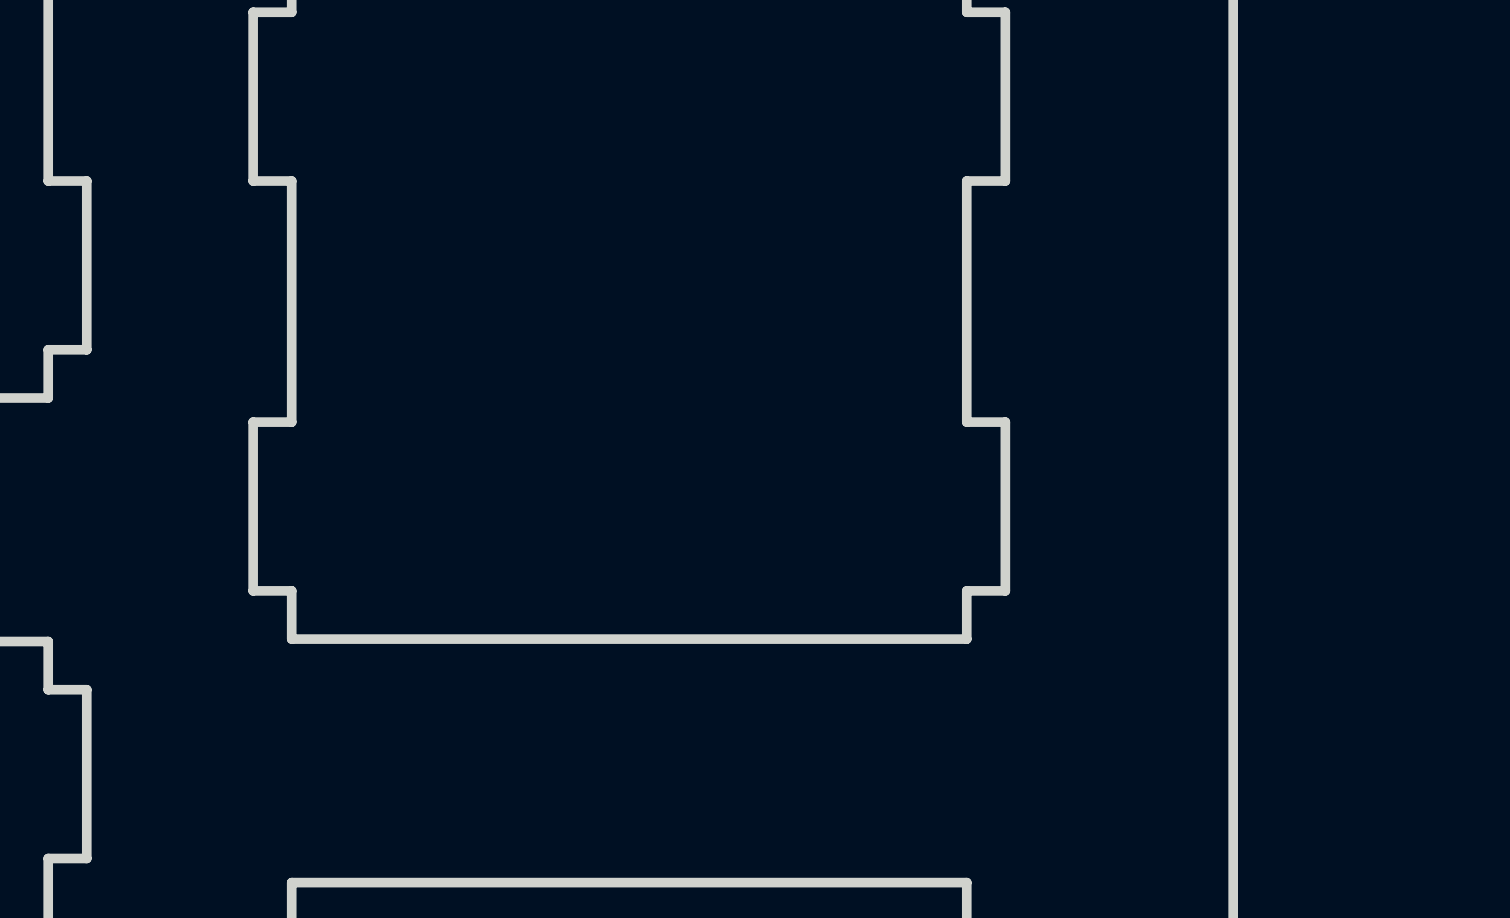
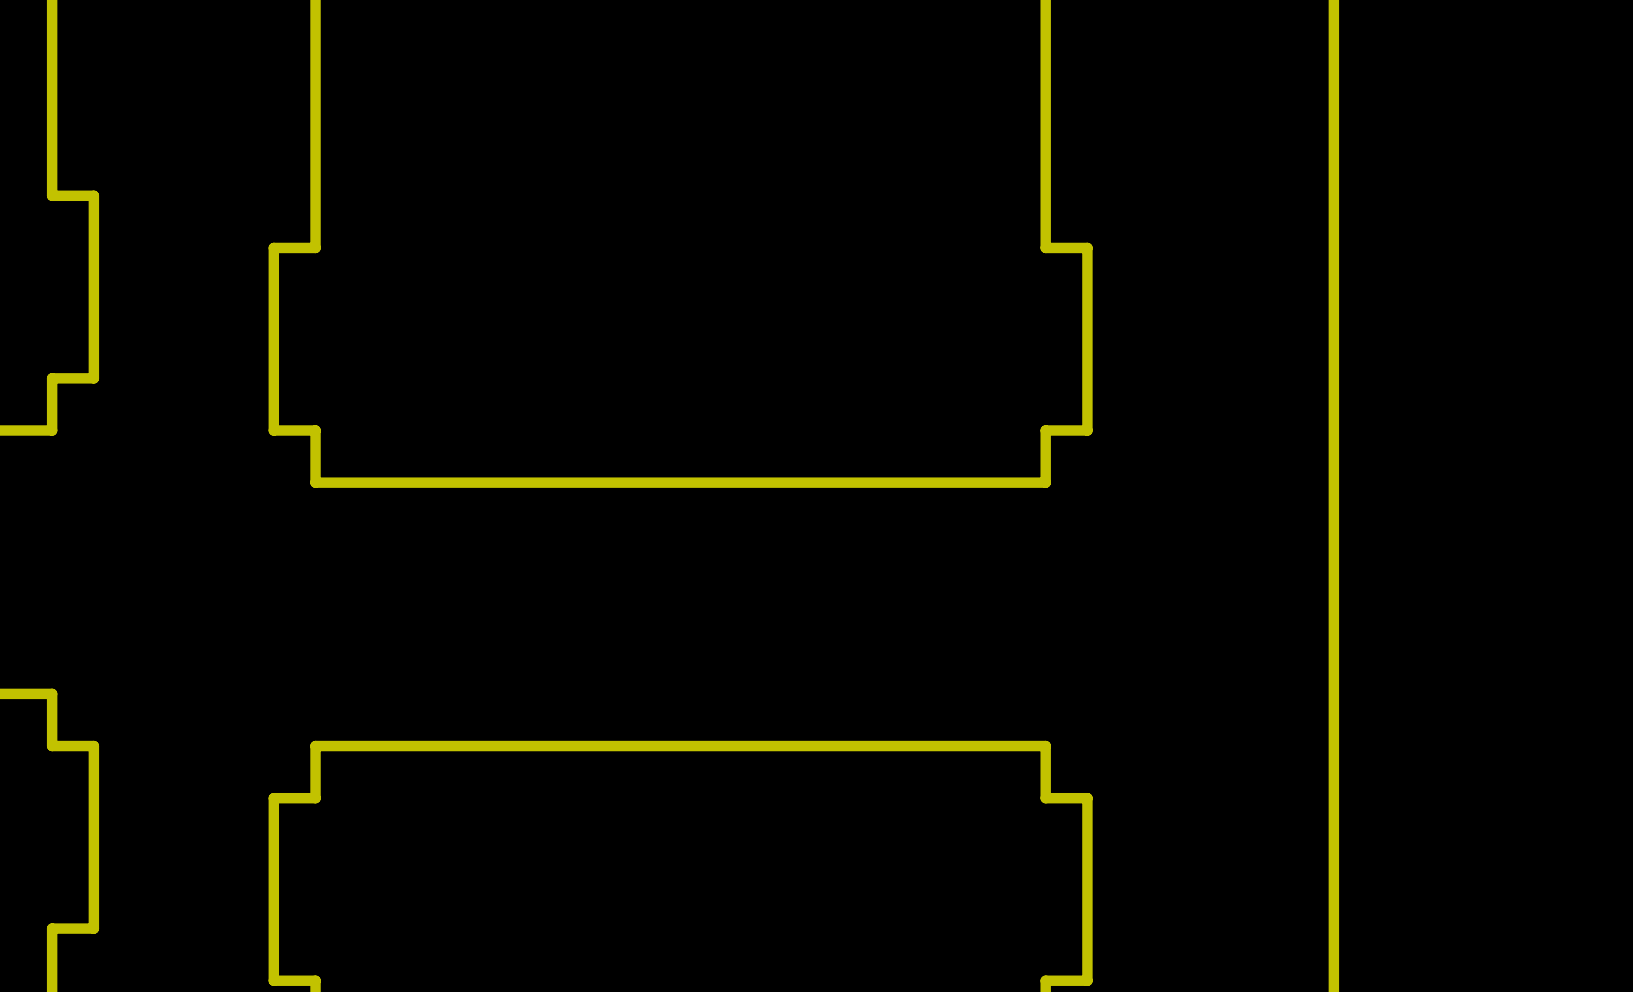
board edge: (291, 12) (253, 12) (253, 181) (291, 181) -> (315, 13) (315, 195)
board edge: (966, 12) (1005, 12) (1005, 181) (966, 181) -> (1045, 13) (1045, 195)
board edge: (291, 229) (291, 398) -> (315, 247) (273, 247) (273, 430) (315, 430)
board edge: (966, 229) (966, 398) -> (1045, 247) (1087, 247) (1087, 430) (1045, 430)
board edge: (966, 422) (1005, 422) (1005, 590) (966, 590) (966, 639) (291, 639) (291, 590) (253, 590) (253, 422) (291, 422) -> (1045, 456) (1045, 482) (315, 482) (315, 456)
board edge: (966, 906) (966, 882) (291, 882) (291, 906) -> (1045, 980) (1087, 980) (1087, 798) (1045, 798) (1045, 746) (315, 746) (315, 798) (273, 798) (273, 980) (315, 980)

